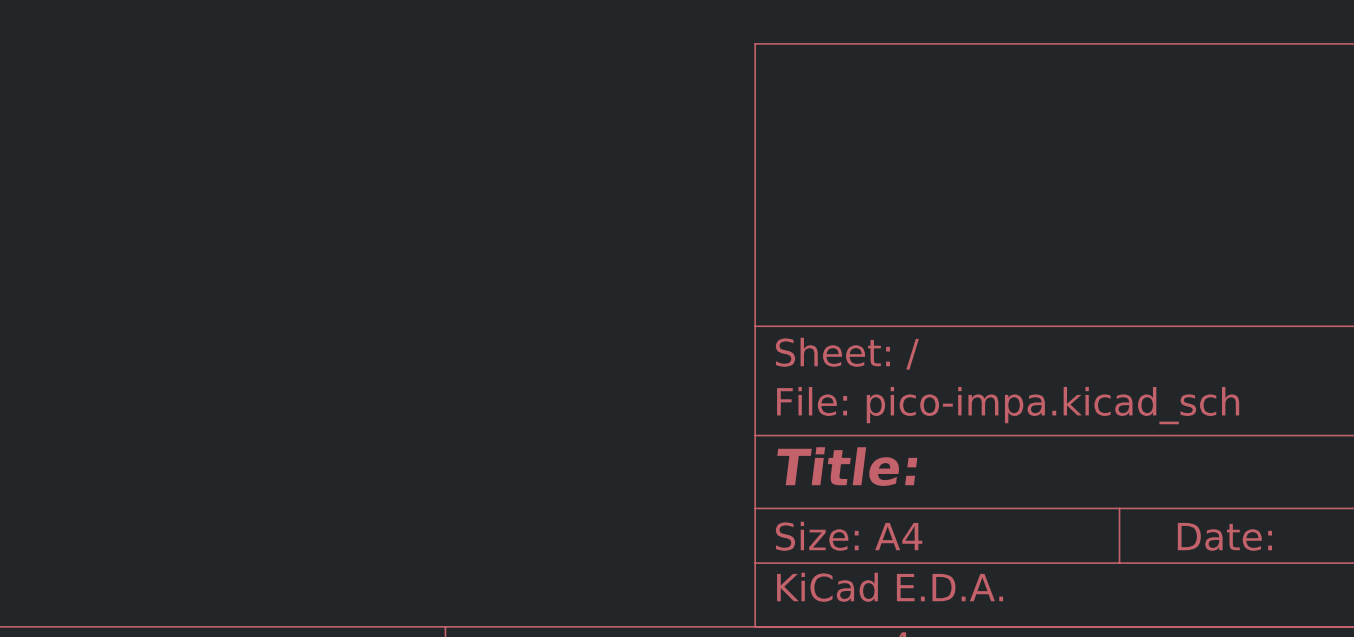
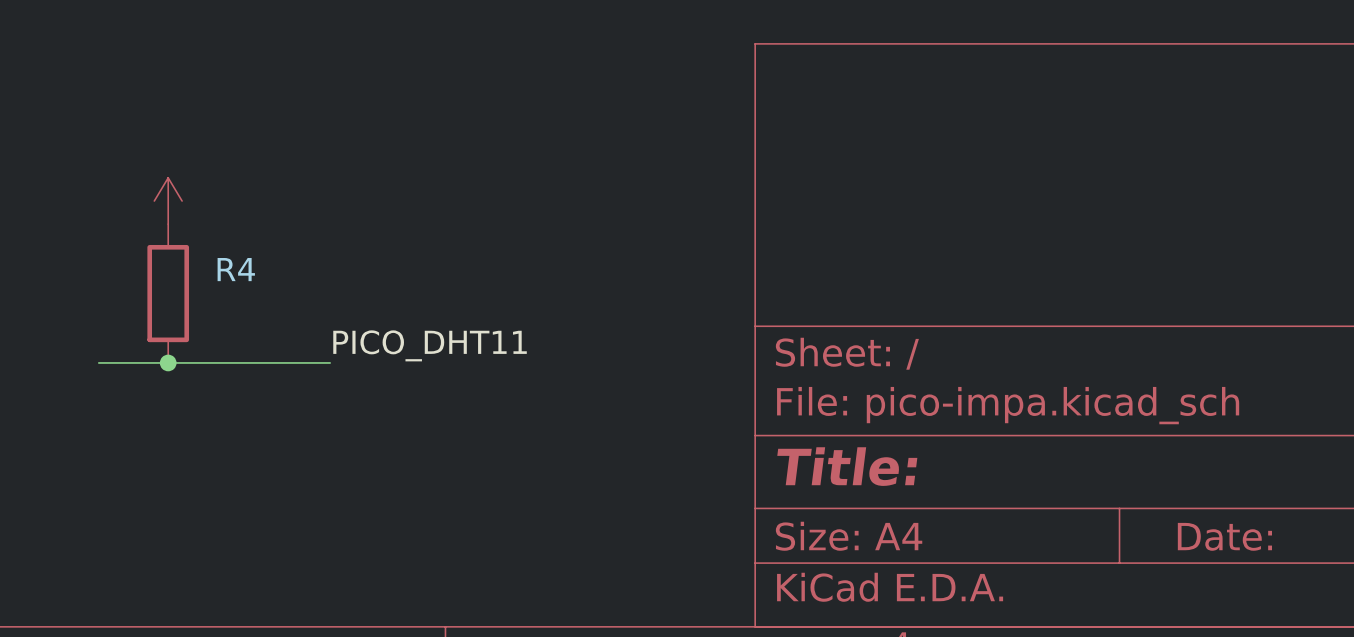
power symbol: none -> (168, 201)
R4: none -> (168, 293)
label: none -> PICO_DHT11 (430, 345)
wire: none -> (98, 362) (330, 362)
junction: none -> (168, 362)

